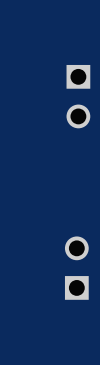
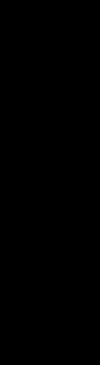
part: (78, 96) -> none
part: (76, 268) -> none

